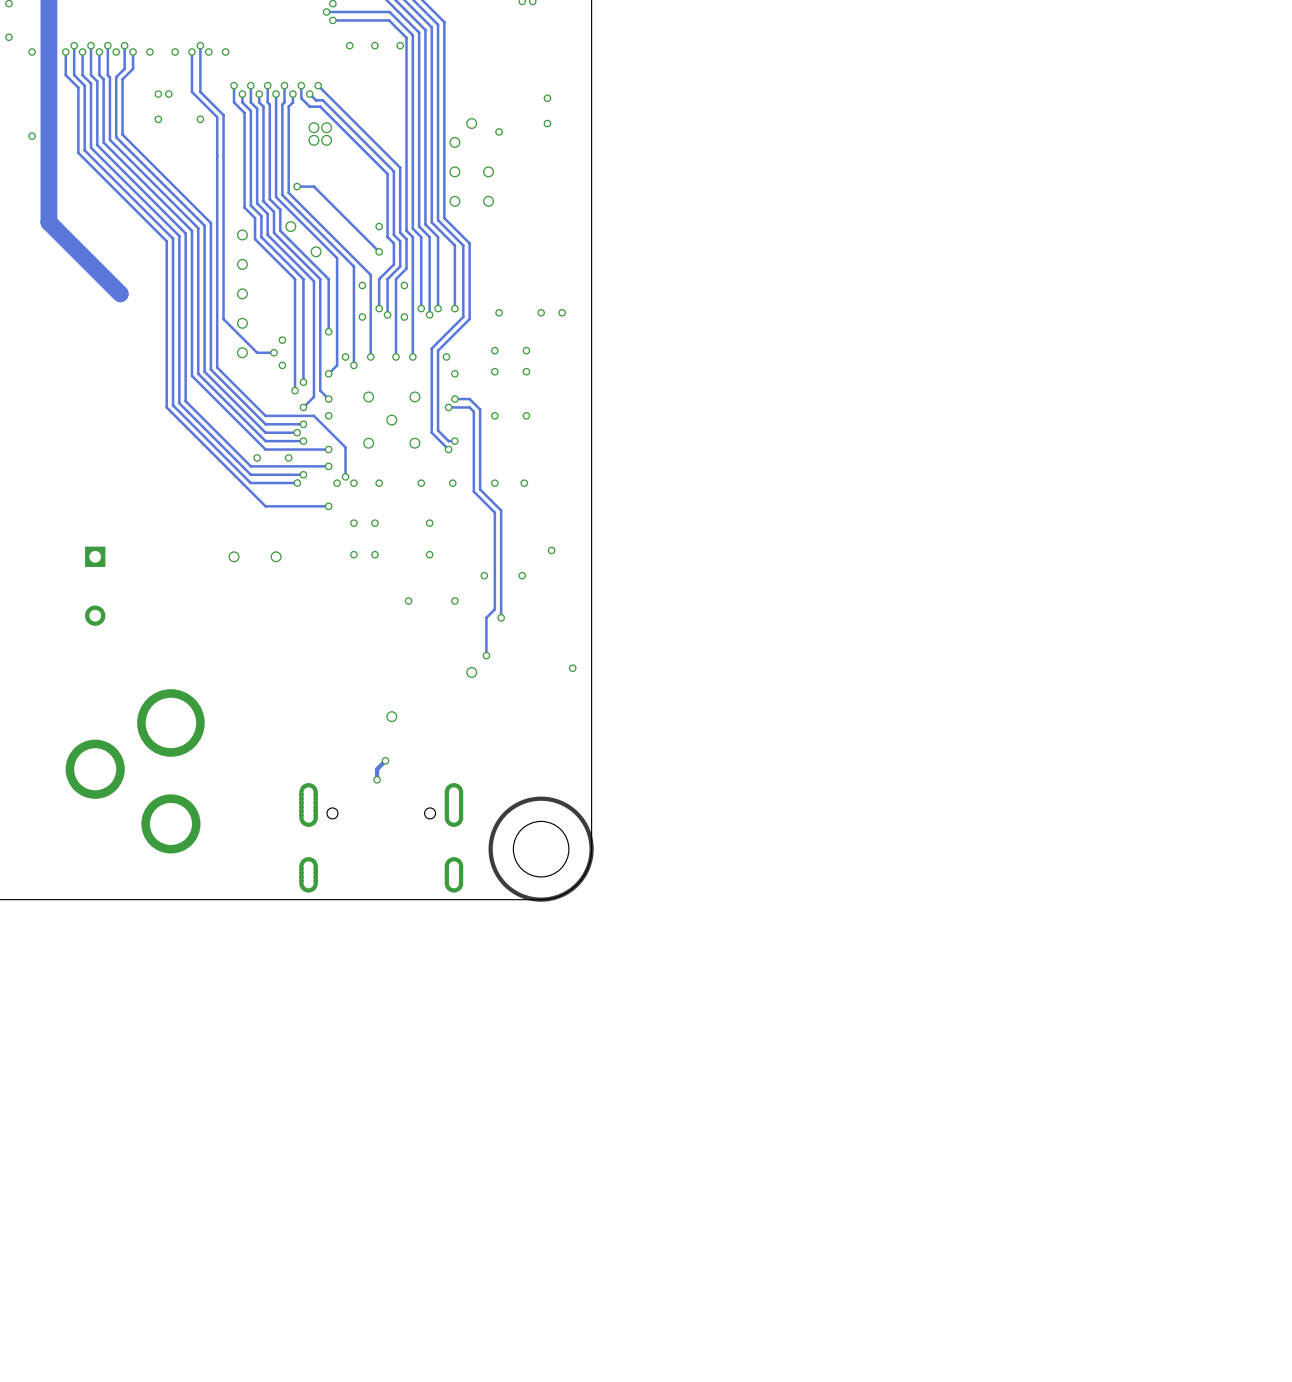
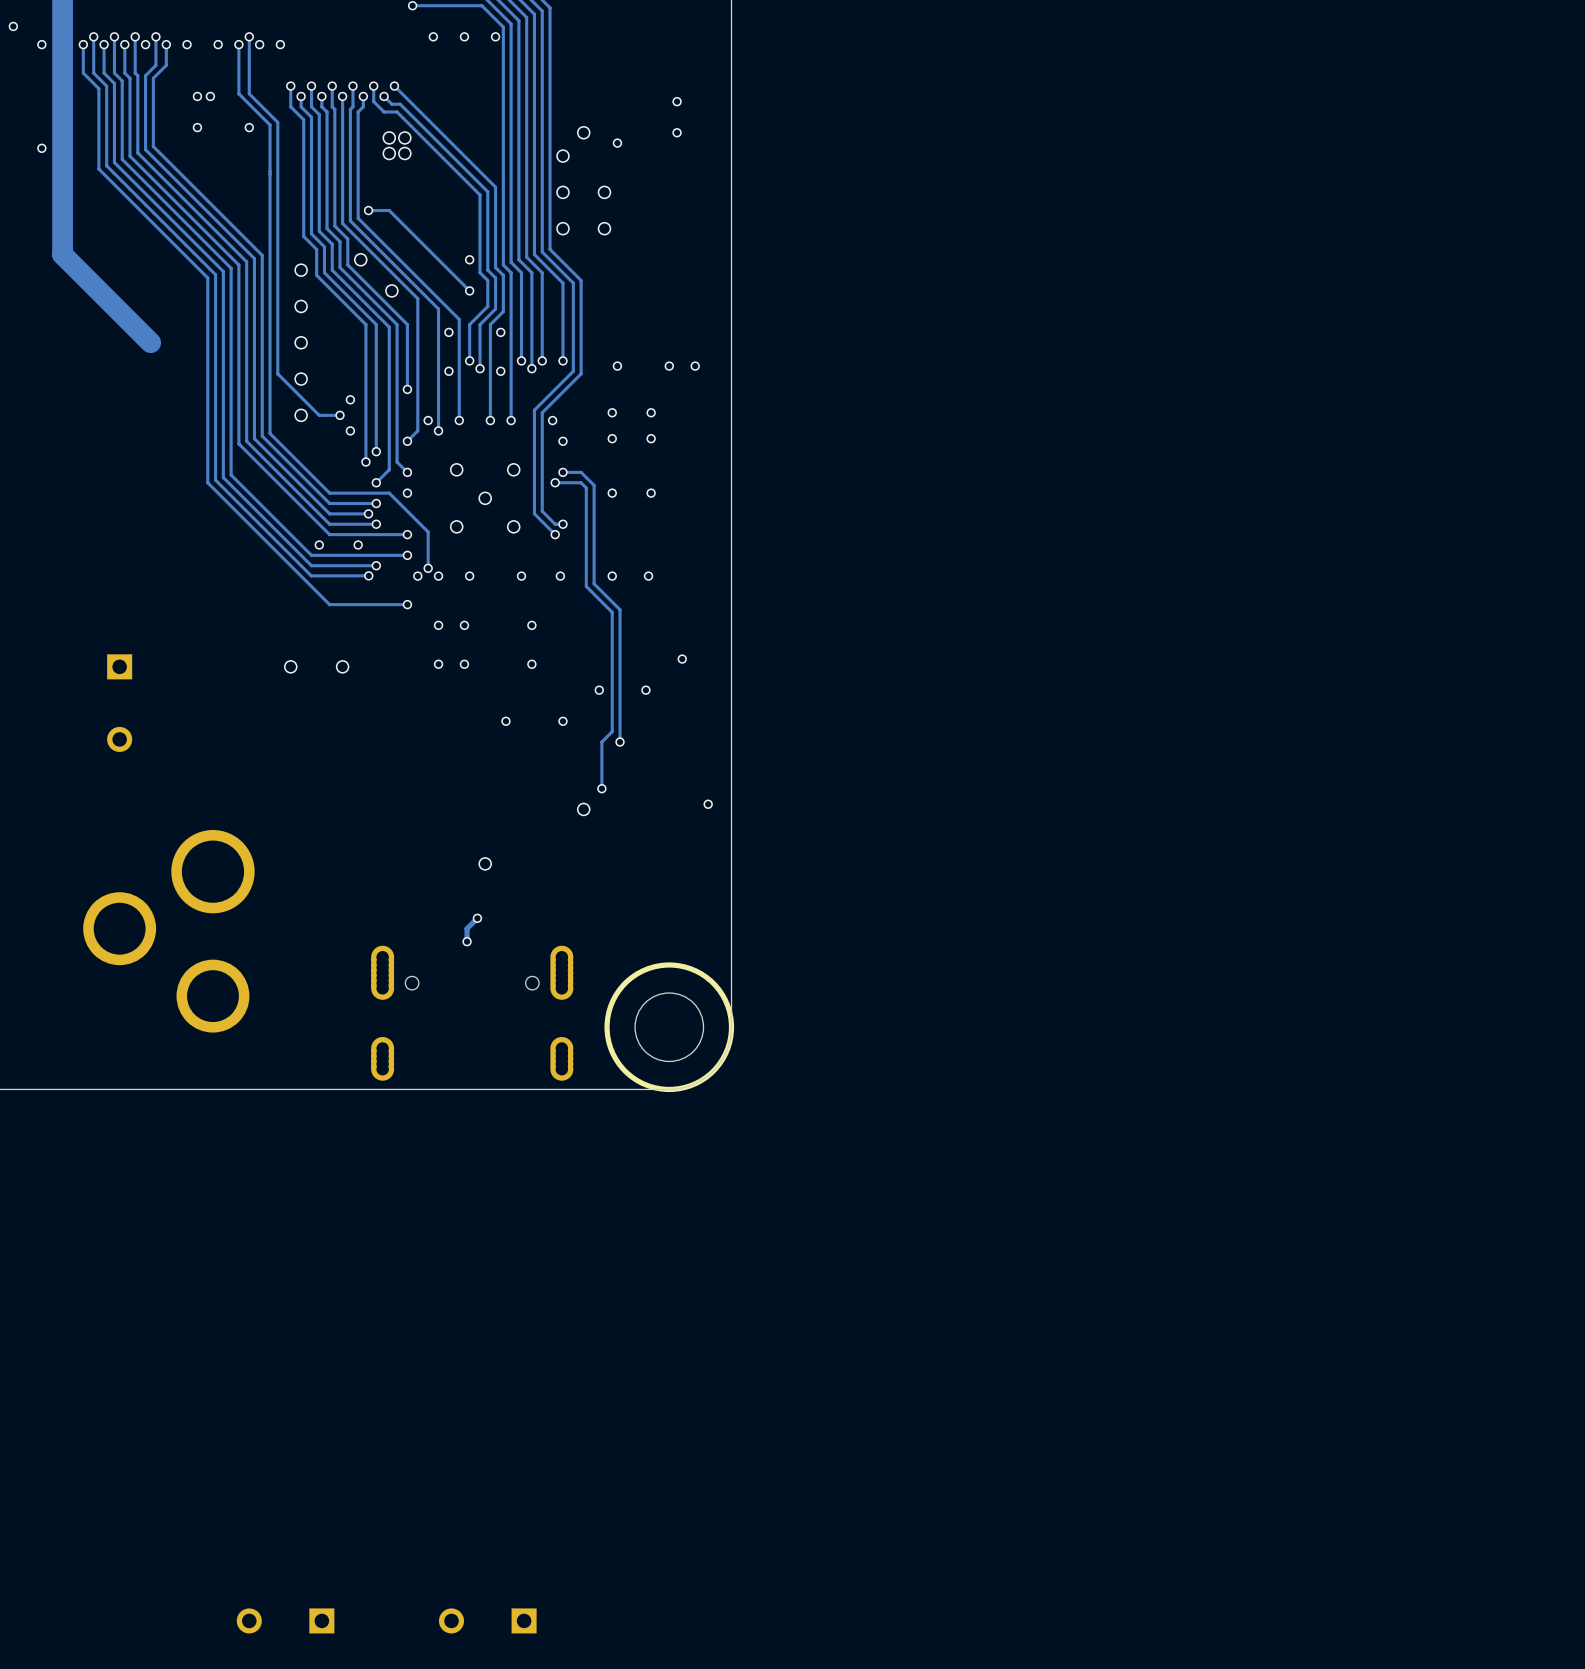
part: none -> (285, 1620)
part: none -> (487, 1620)

